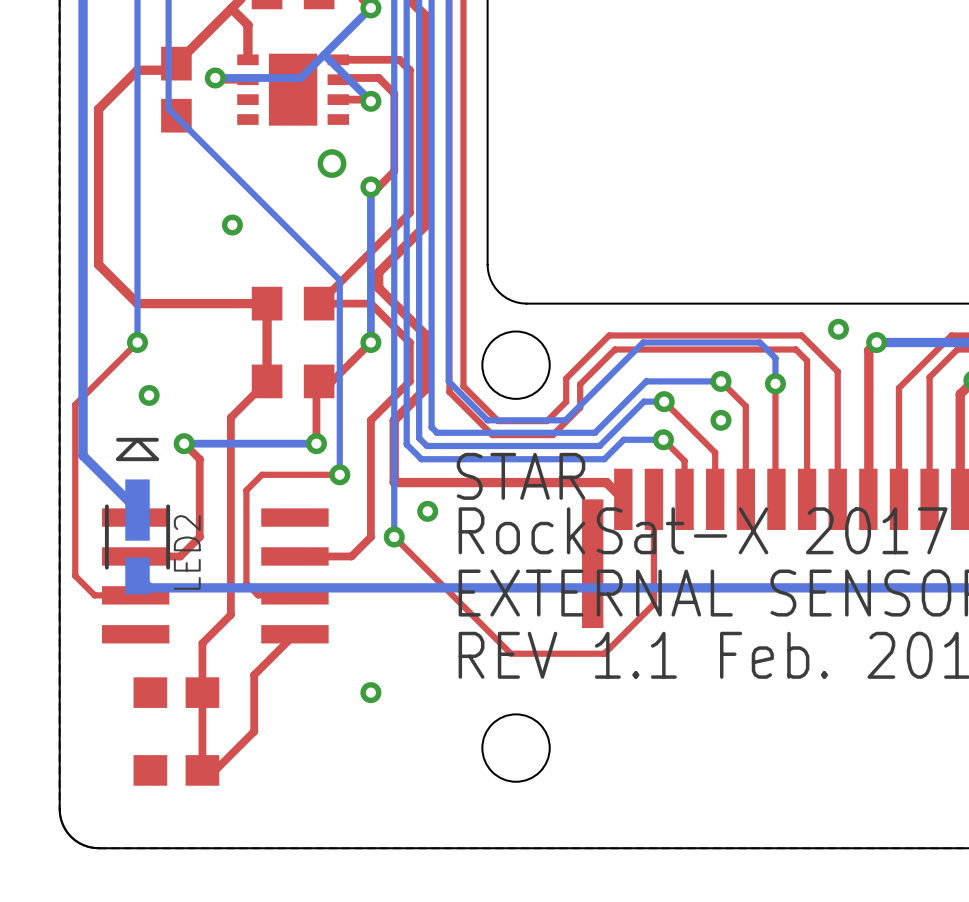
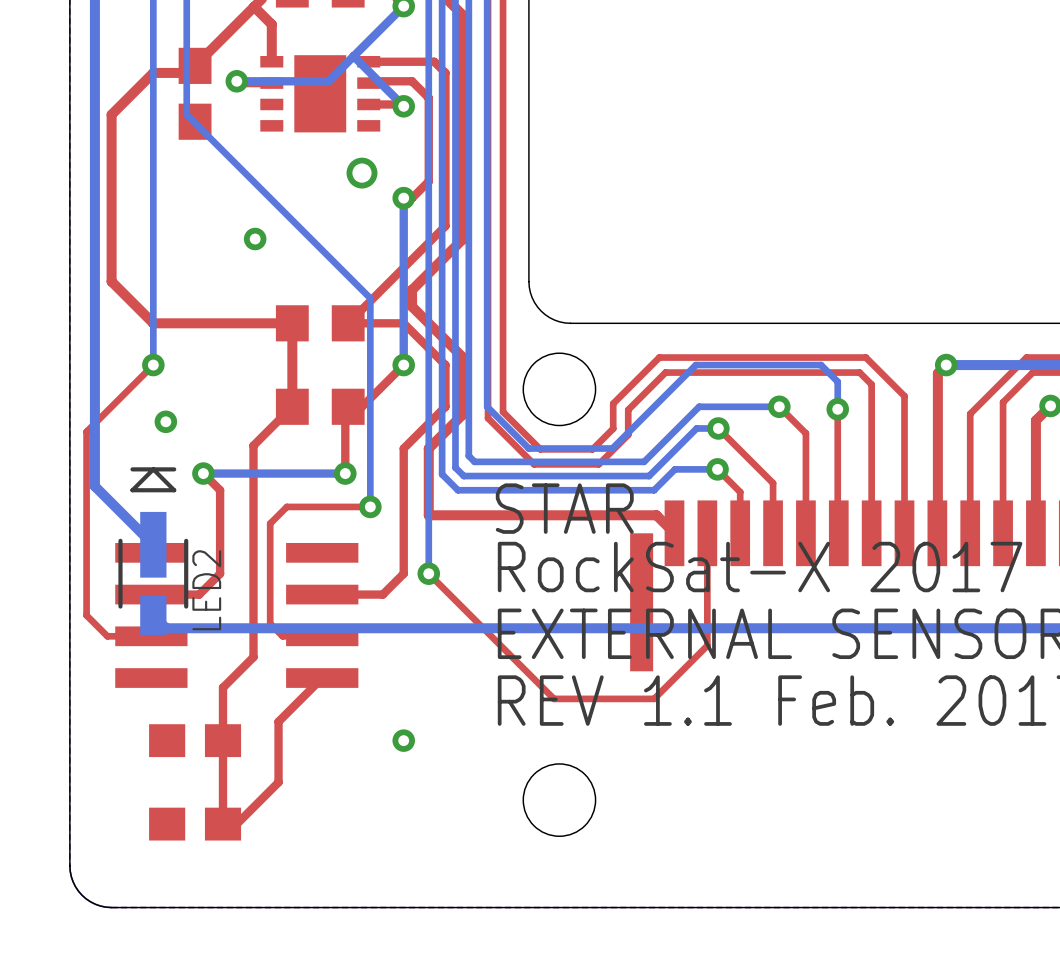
via: (838, 329) -> none
via: (721, 420) -> none
via: (427, 511) -> none

